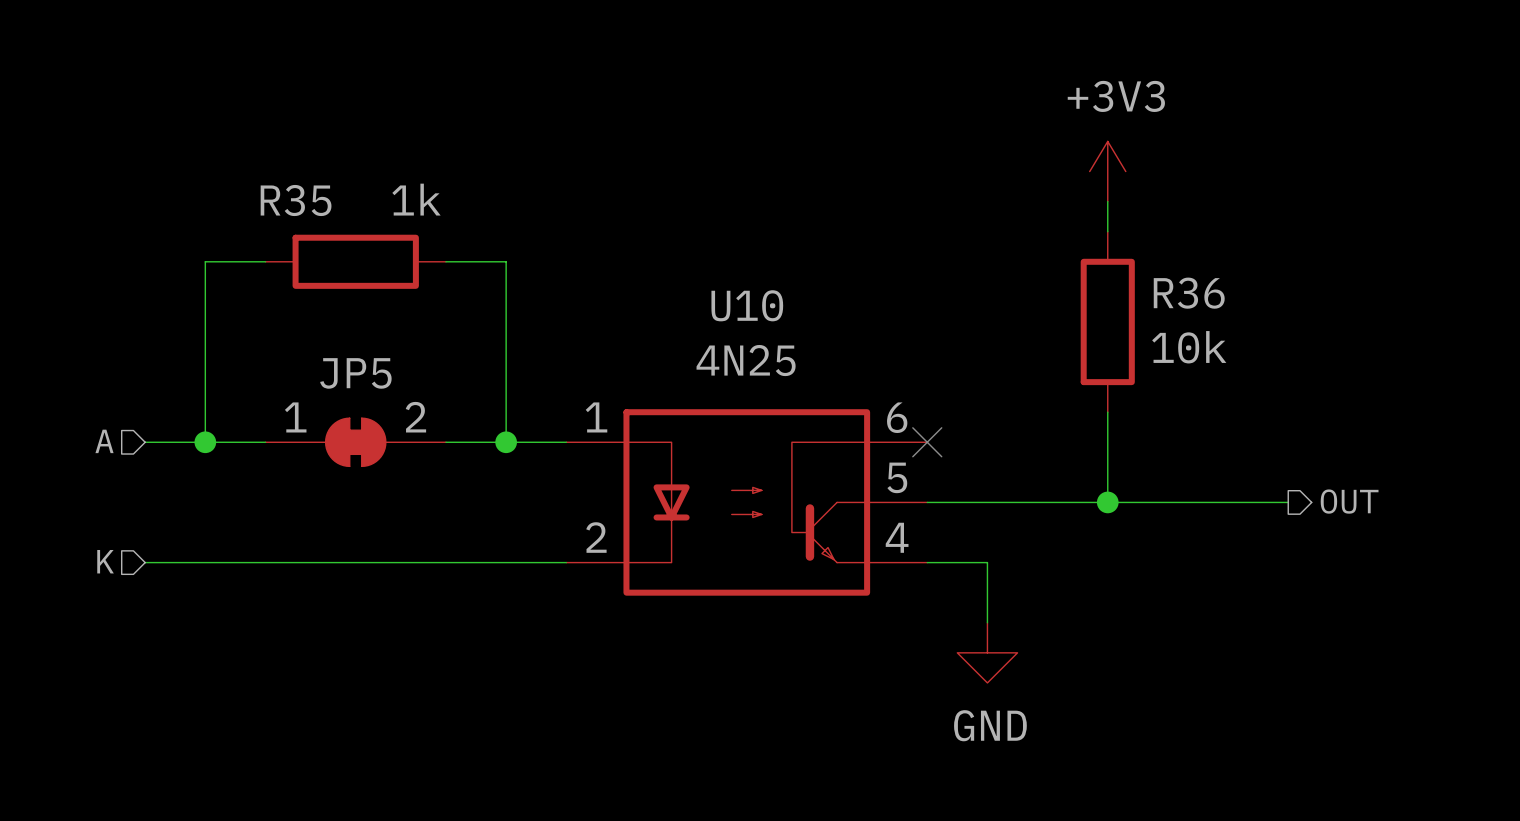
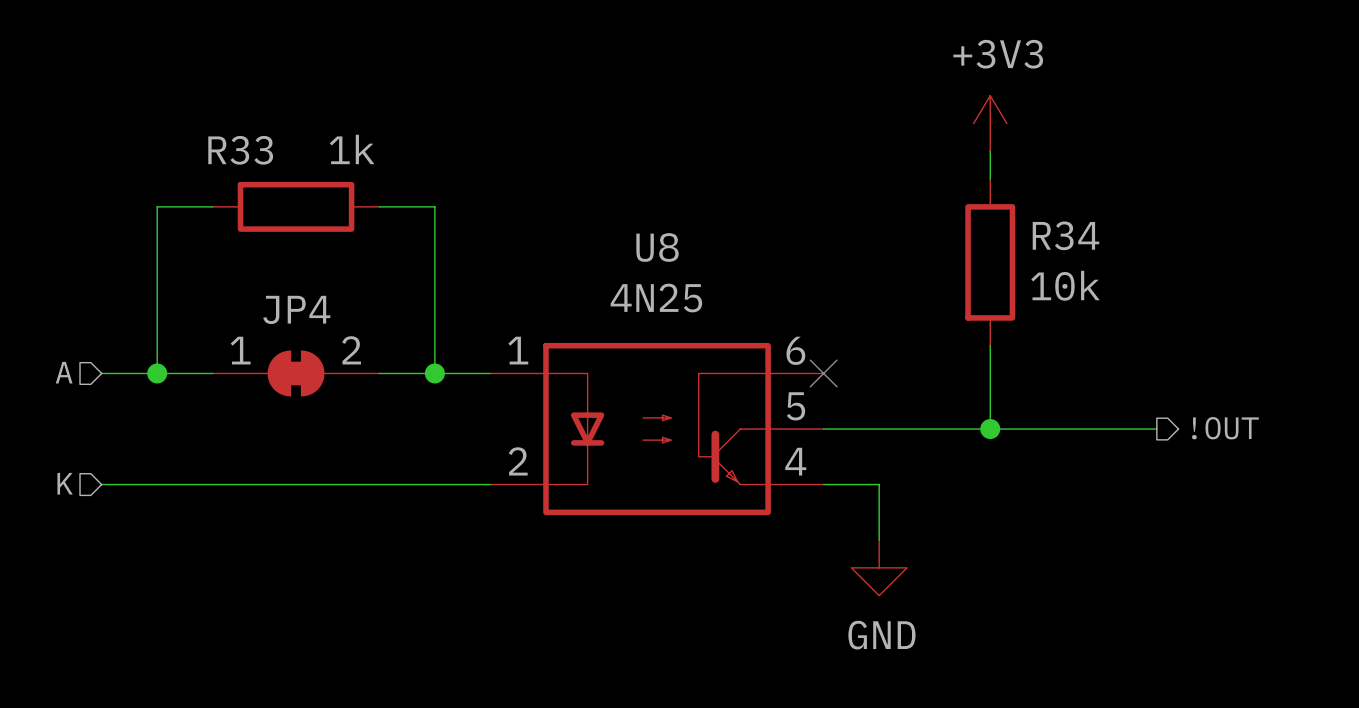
R35 name: R35 (296, 200) -> R33 (240, 150)
R36 name: R36 (1189, 293) -> R34 (1065, 235)
U10 name: U10 (747, 305) -> U8 (657, 247)
JP5 name: JP5 (355, 373) -> JP4 (296, 309)
hierarchical label: OUT (1349, 501) -> !OUT (1225, 428)

